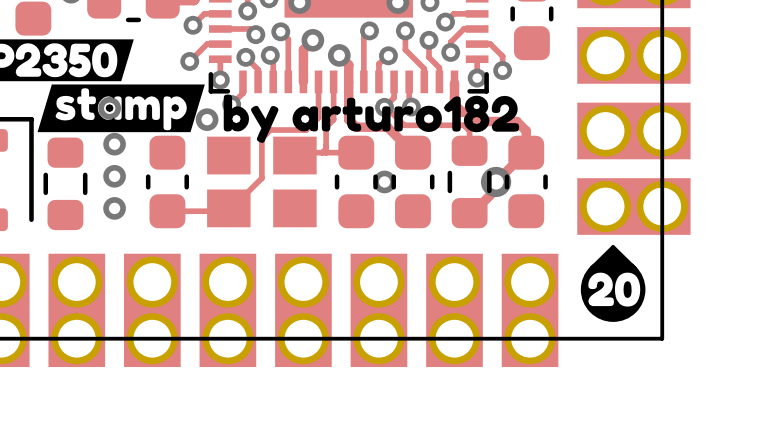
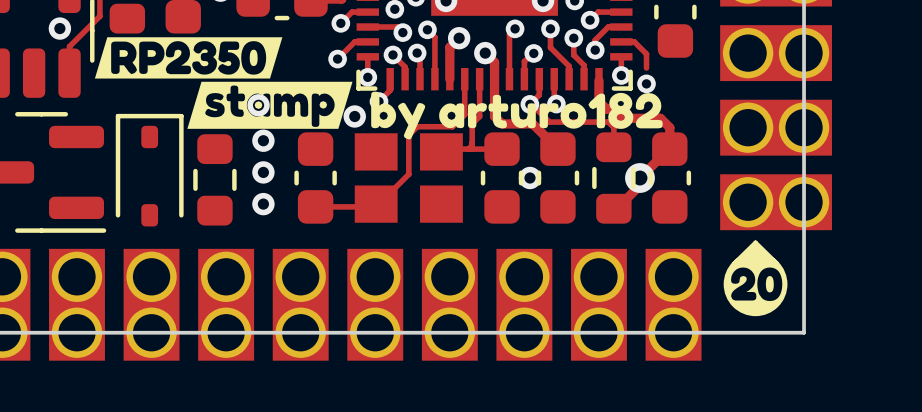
via position: (502, 70) -> (646, 83)

